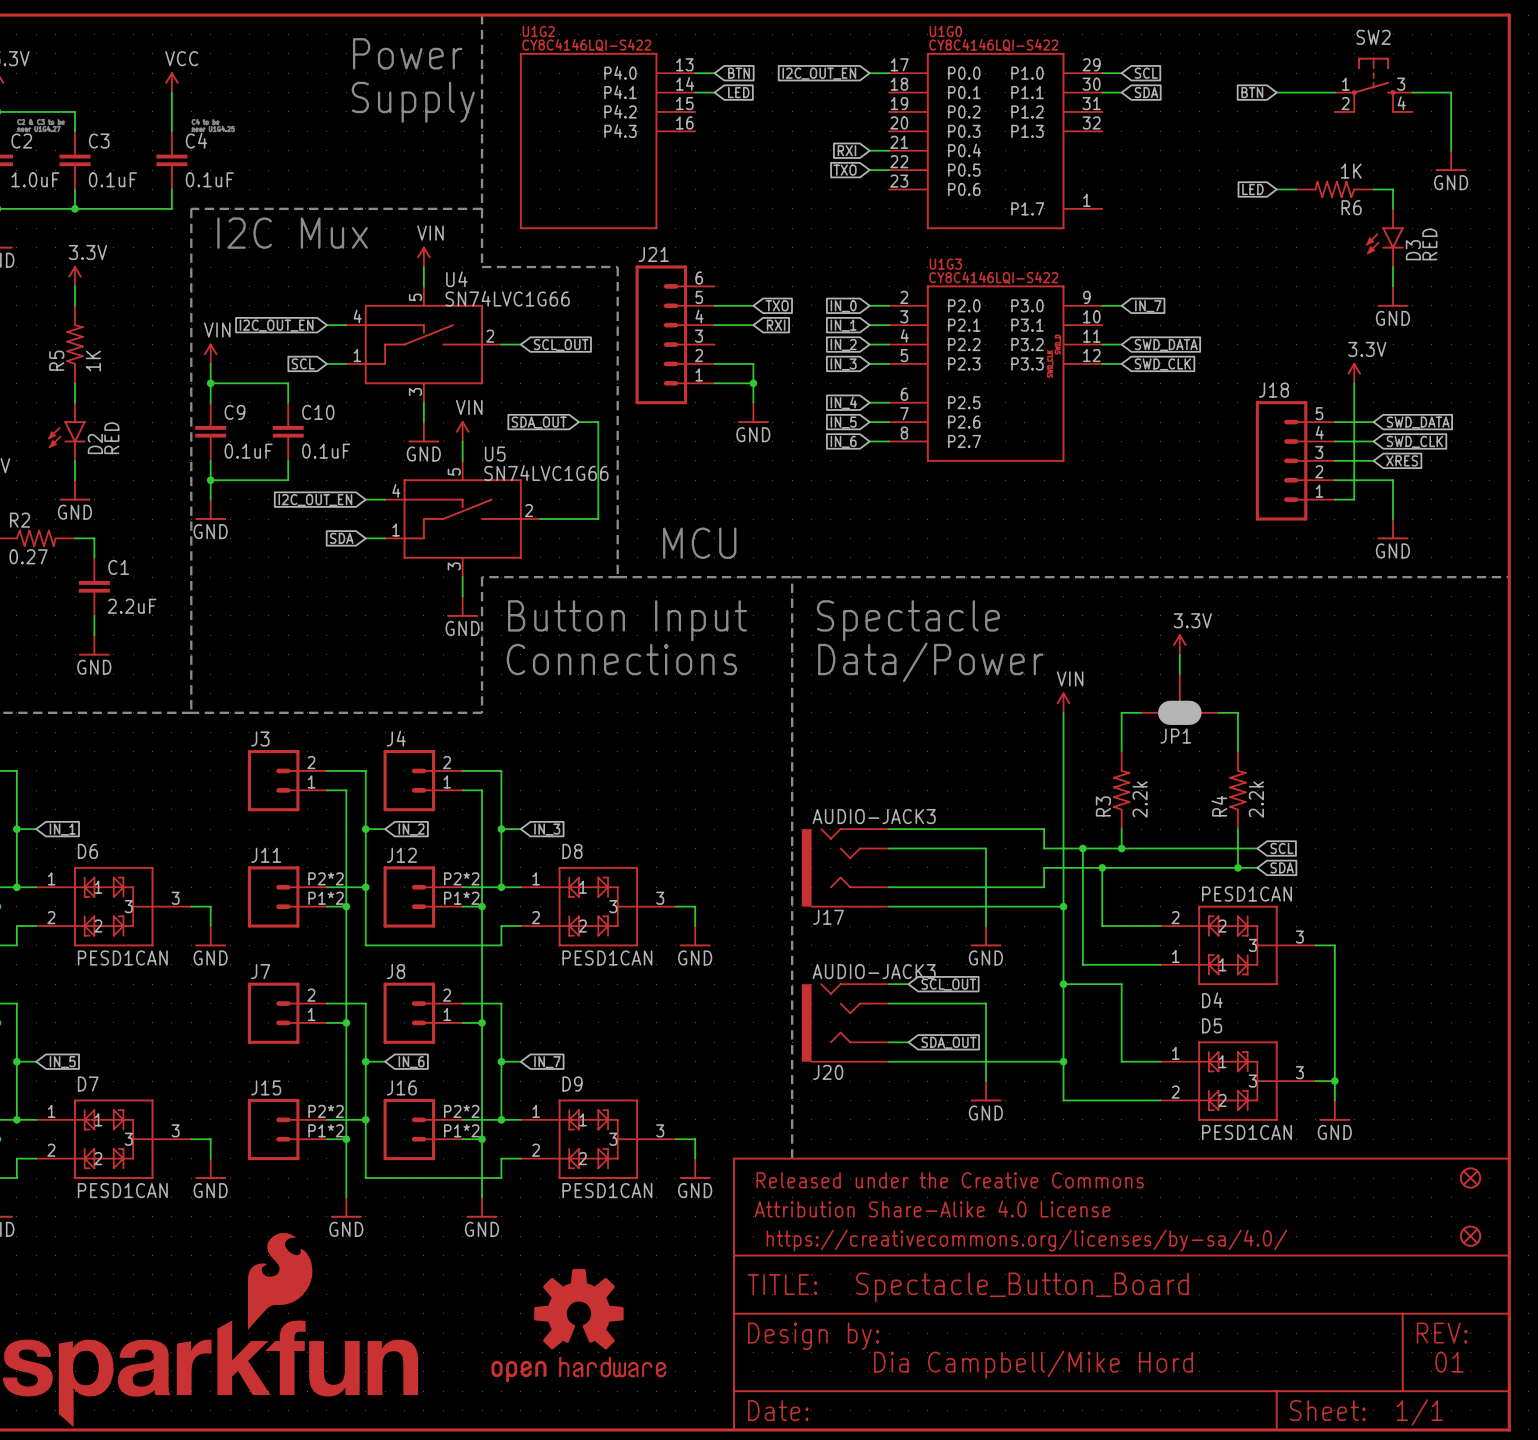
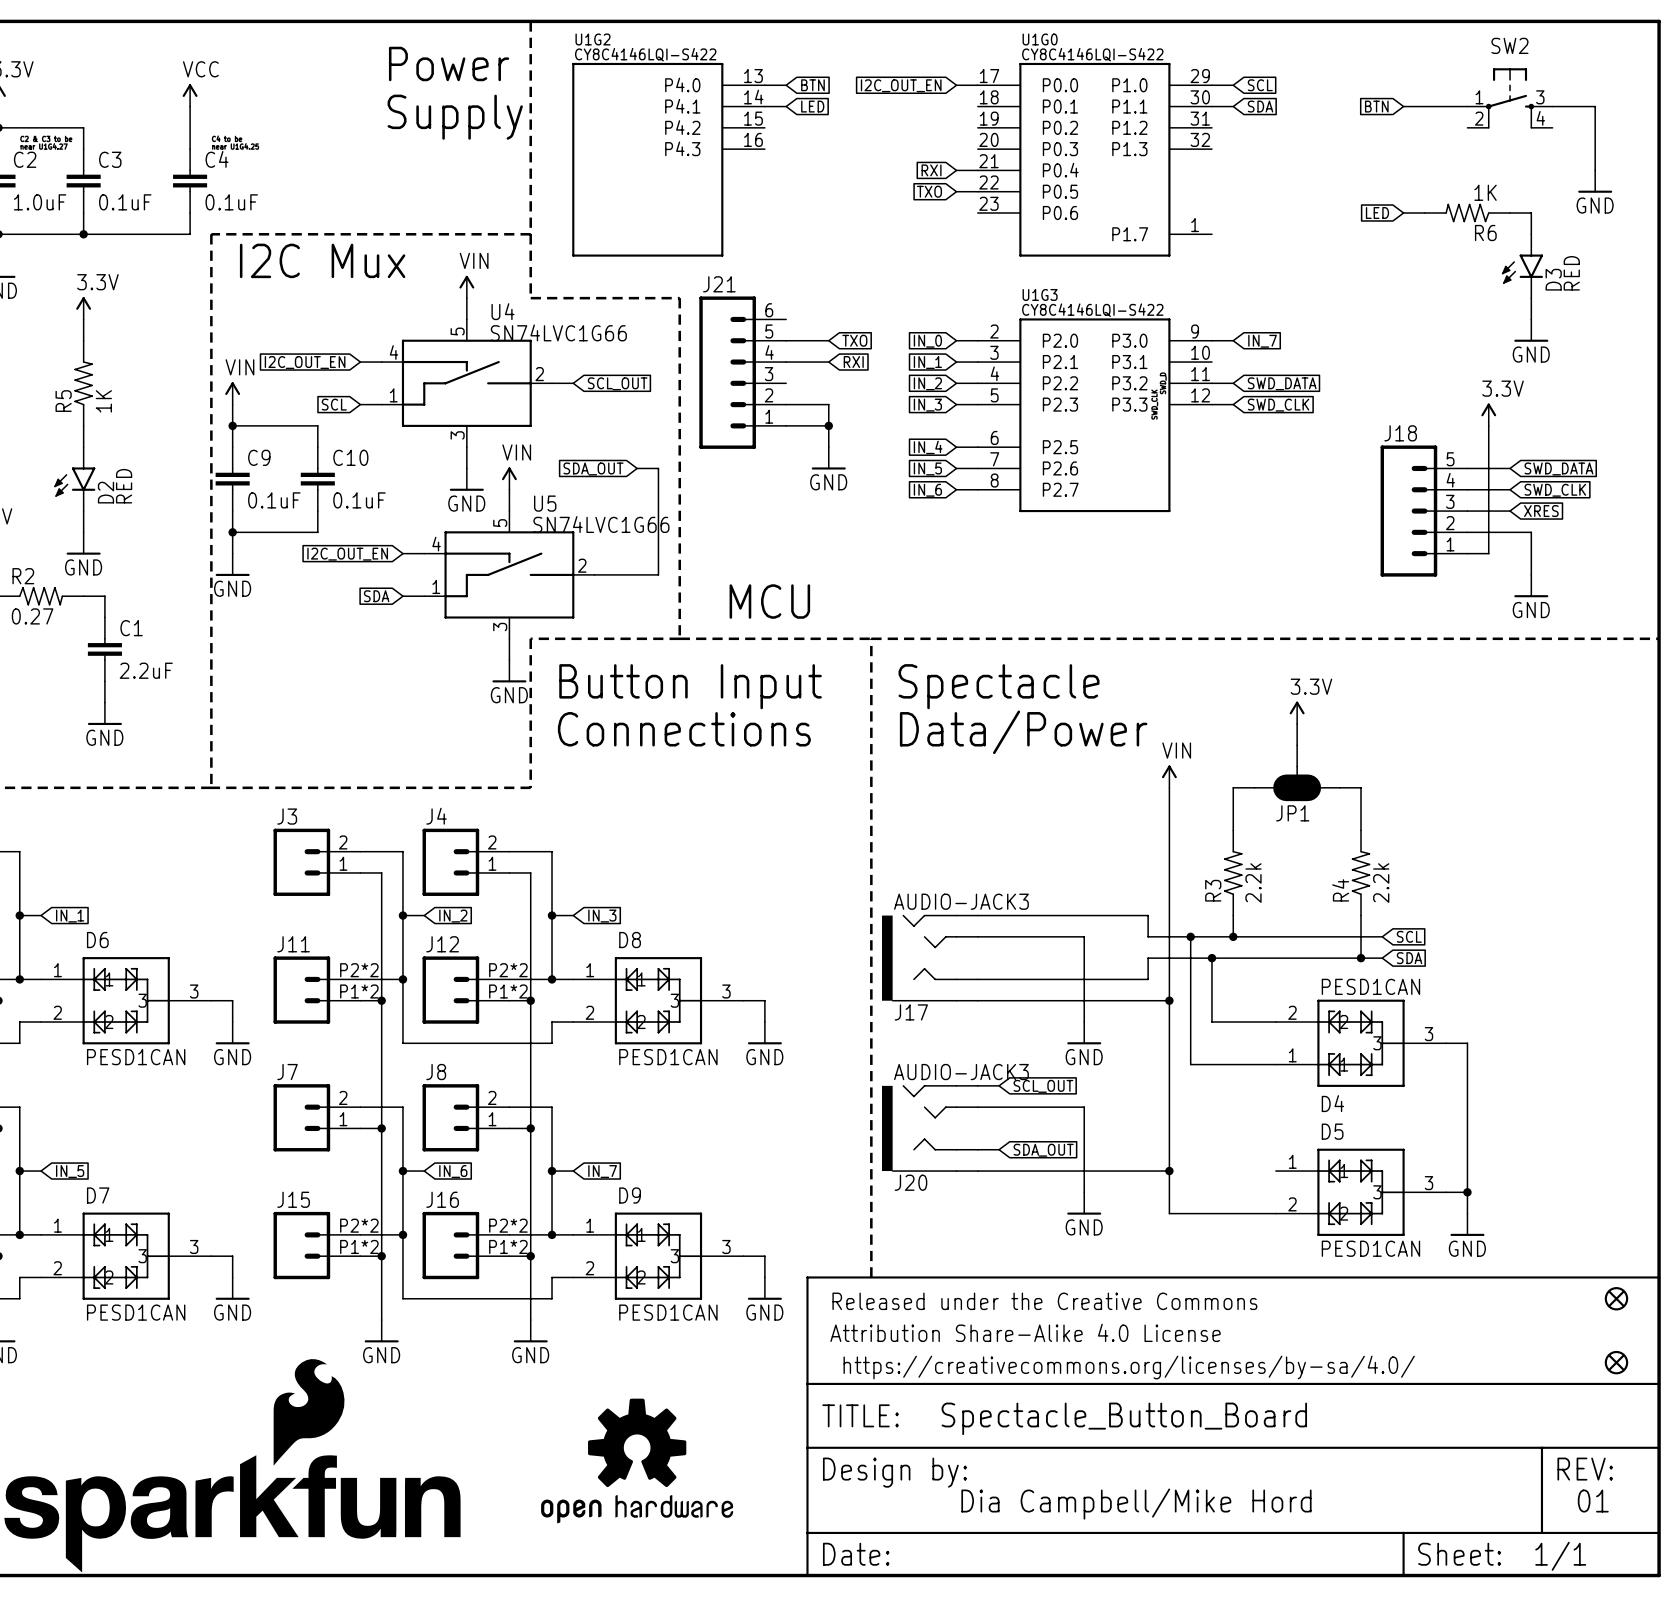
wire: (1063, 984) (1121, 984) (1121, 1061) (1160, 1061) -> none
junction: (1063, 984) -> none

